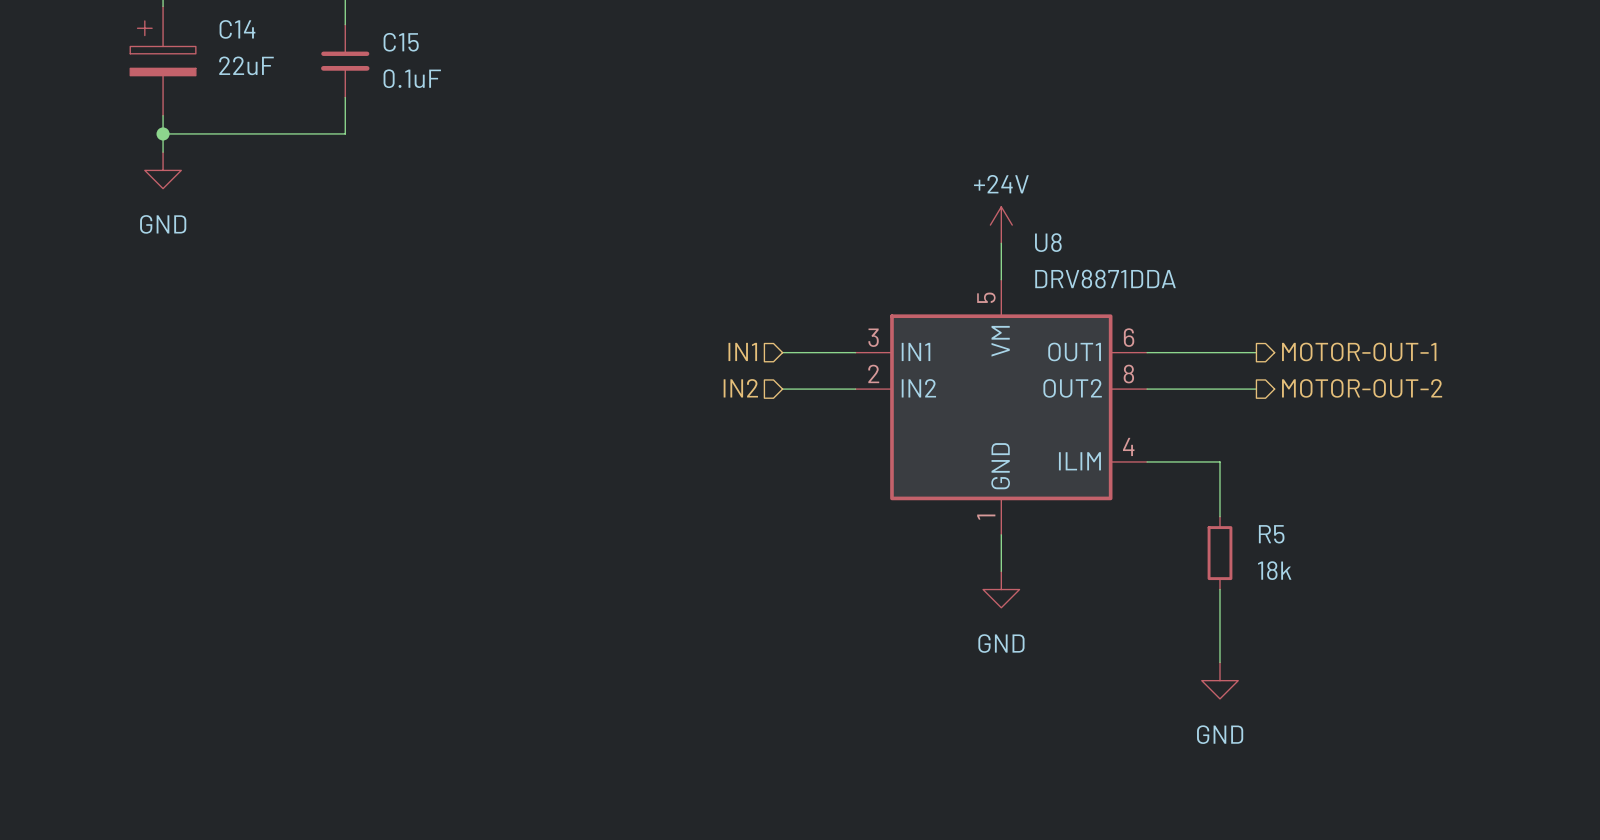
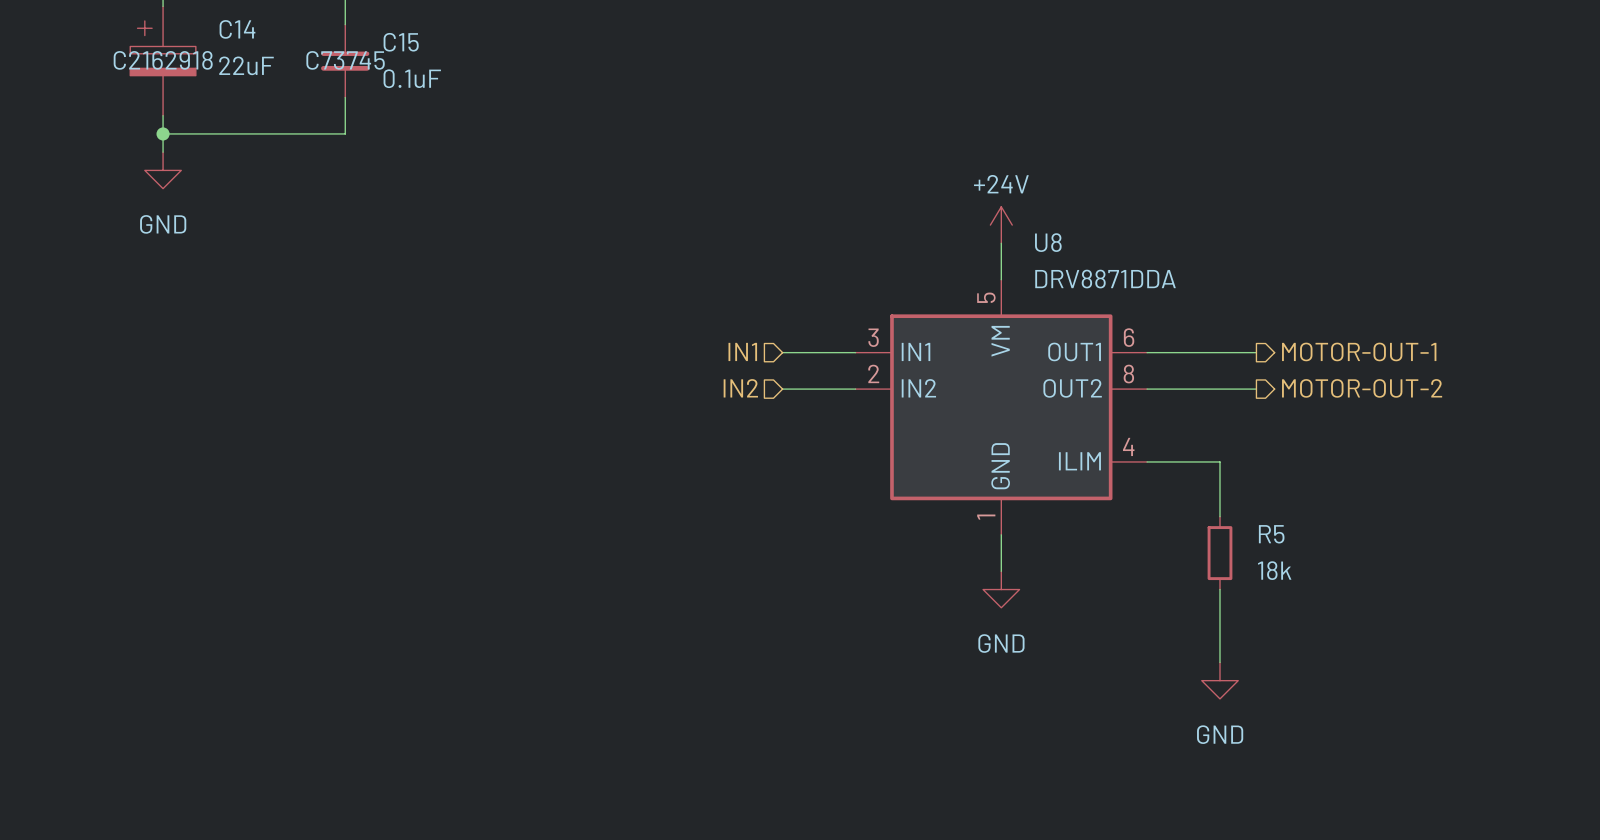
C14 text: none -> C2162918 (163, 60)
C15 text: none -> C73745 (345, 60)

